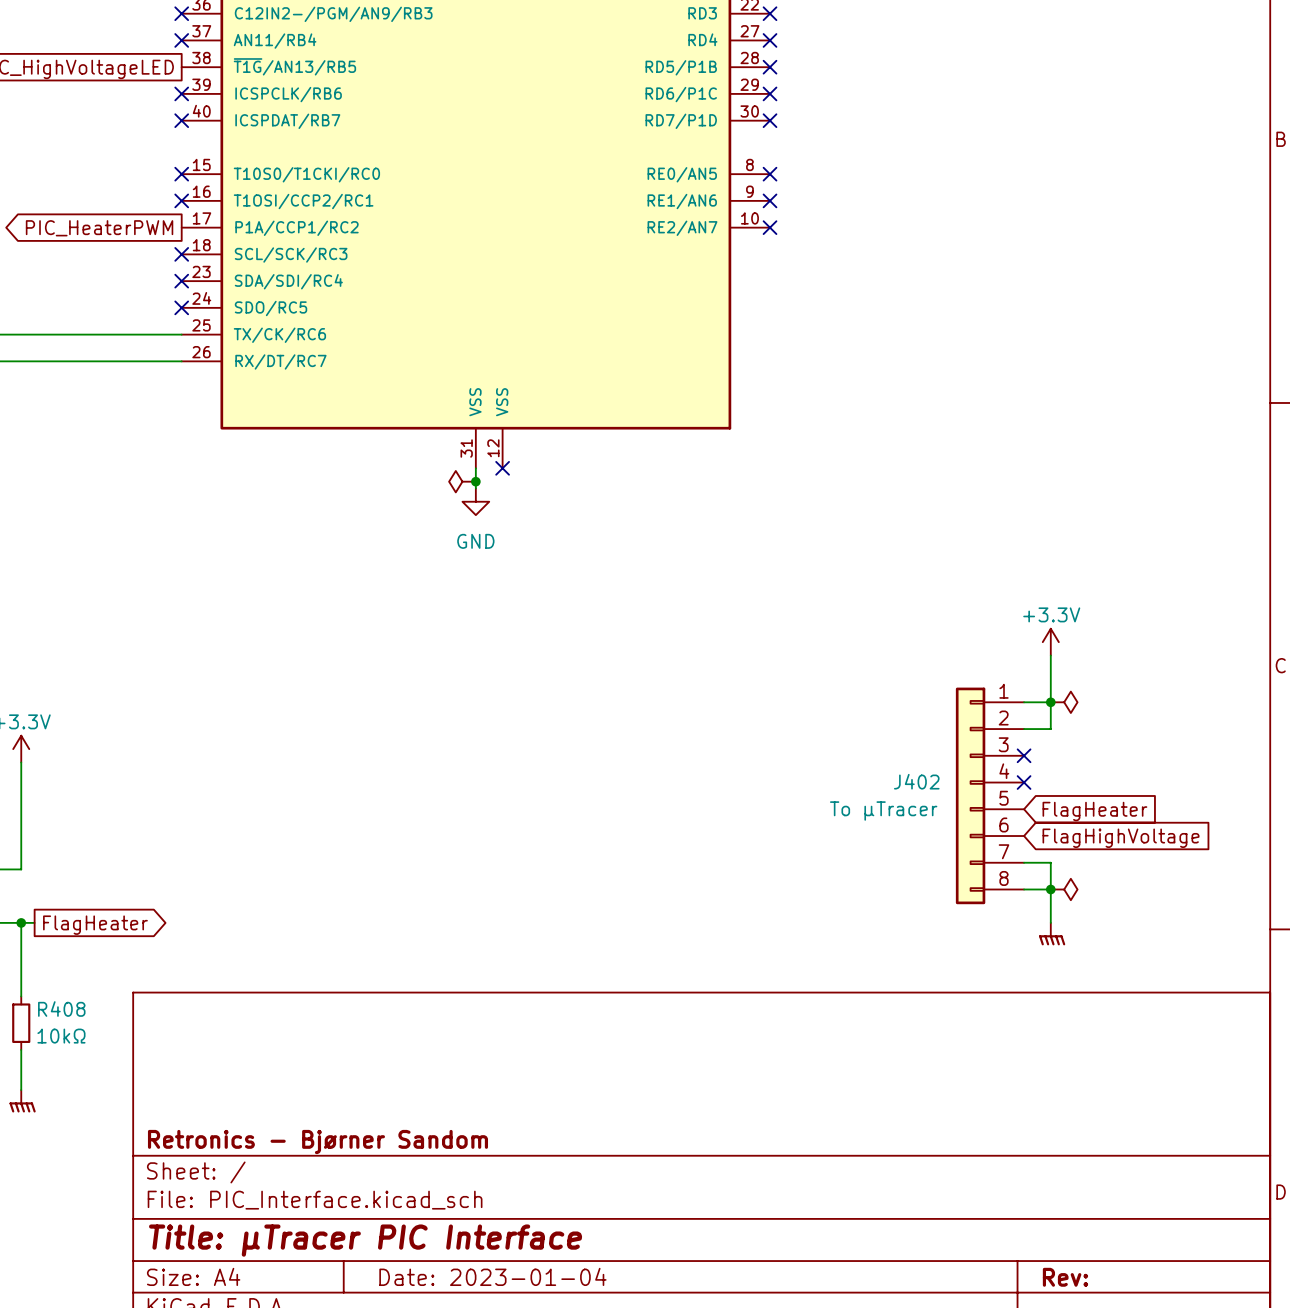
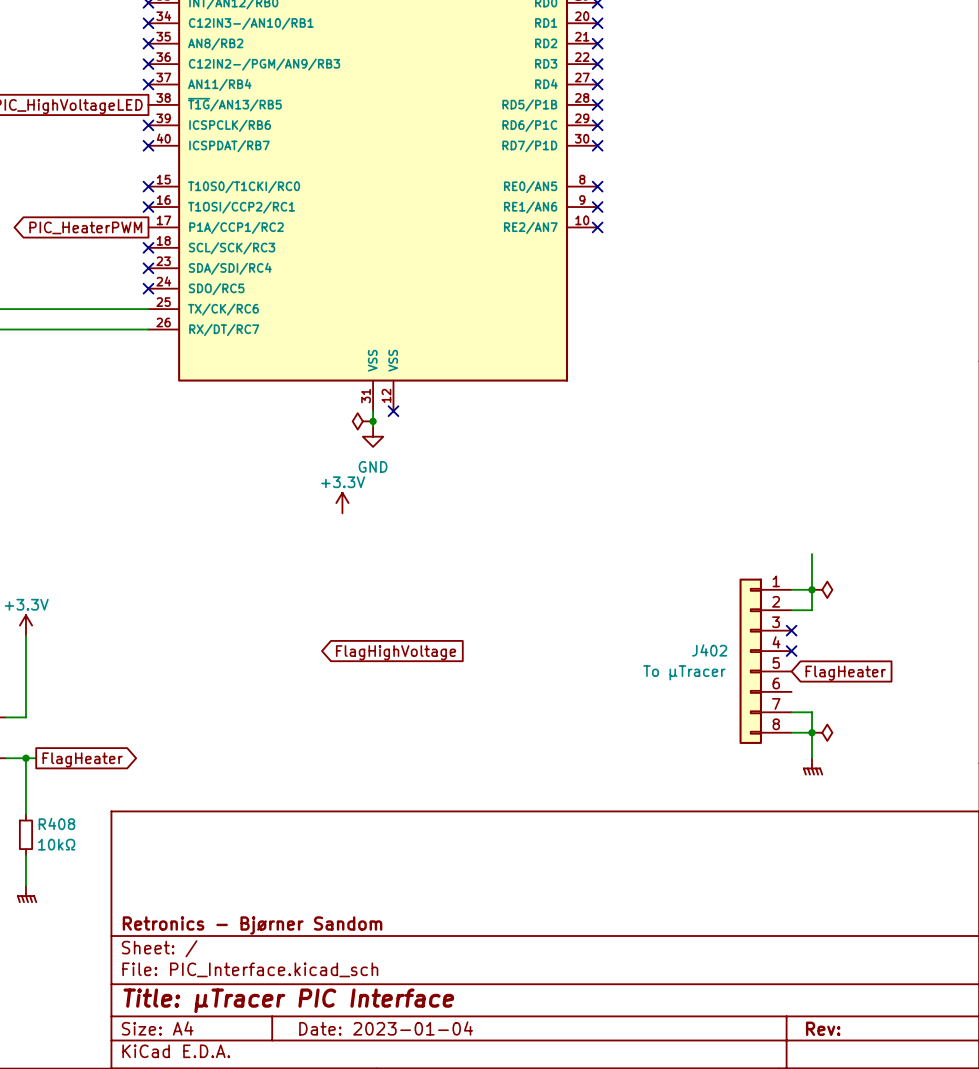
power symbol: none -> +3.3V (342, 503)
power symbol: +3.3V (1050, 642) -> none
global label: none -> FlagHighVoltage (396, 652)
global label: FlagHighVoltage (1121, 838) -> none

